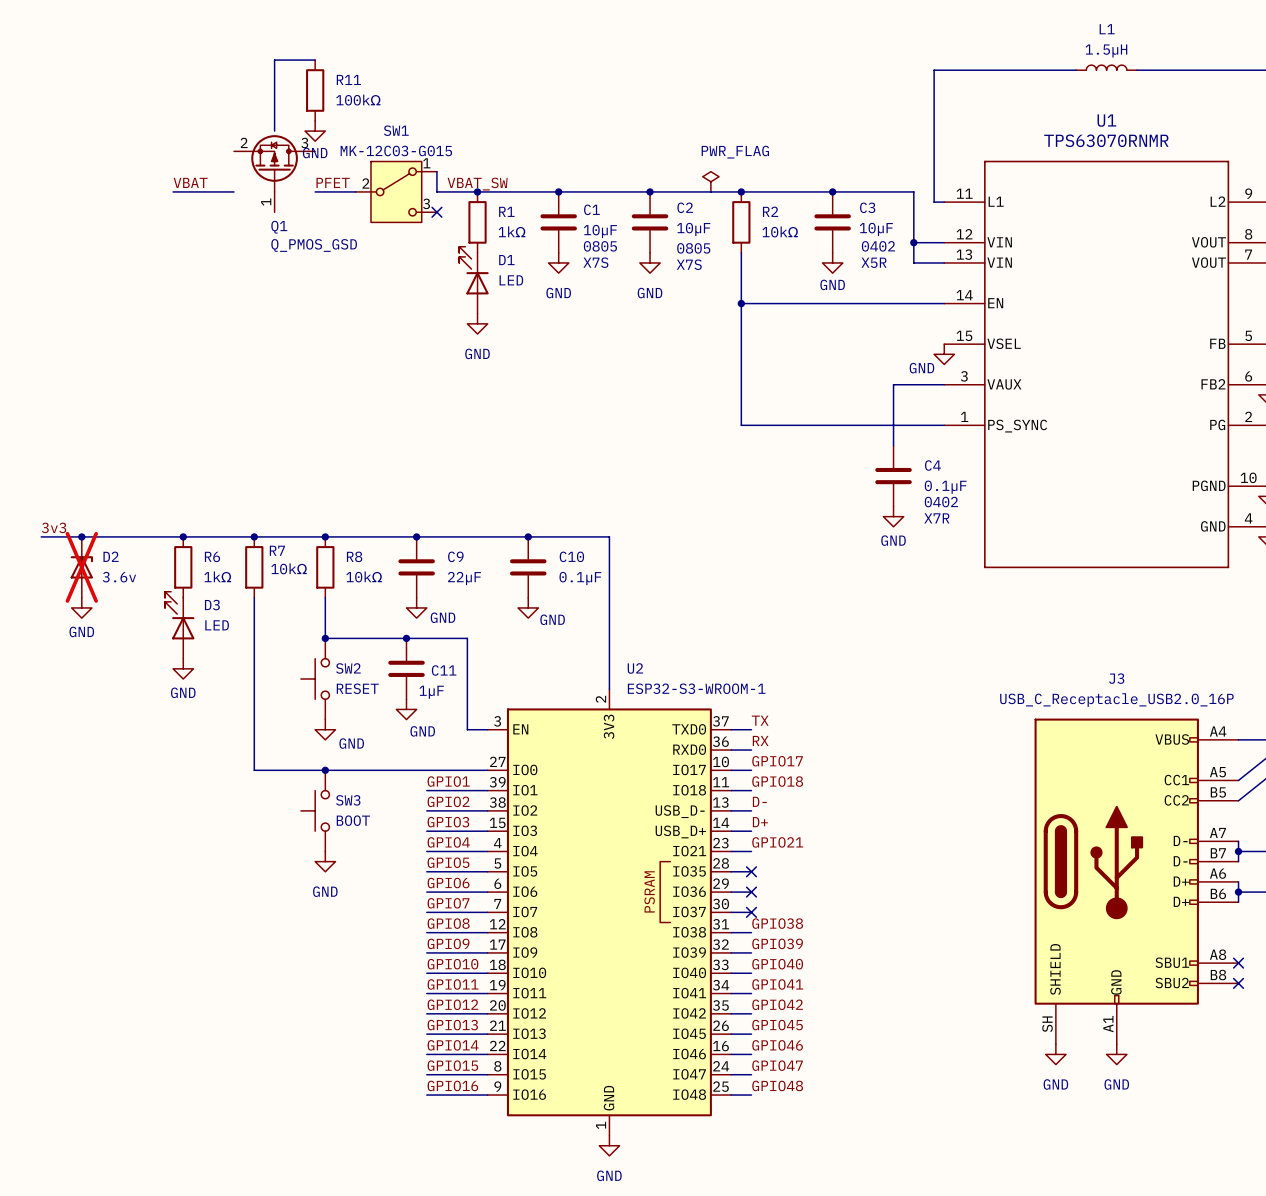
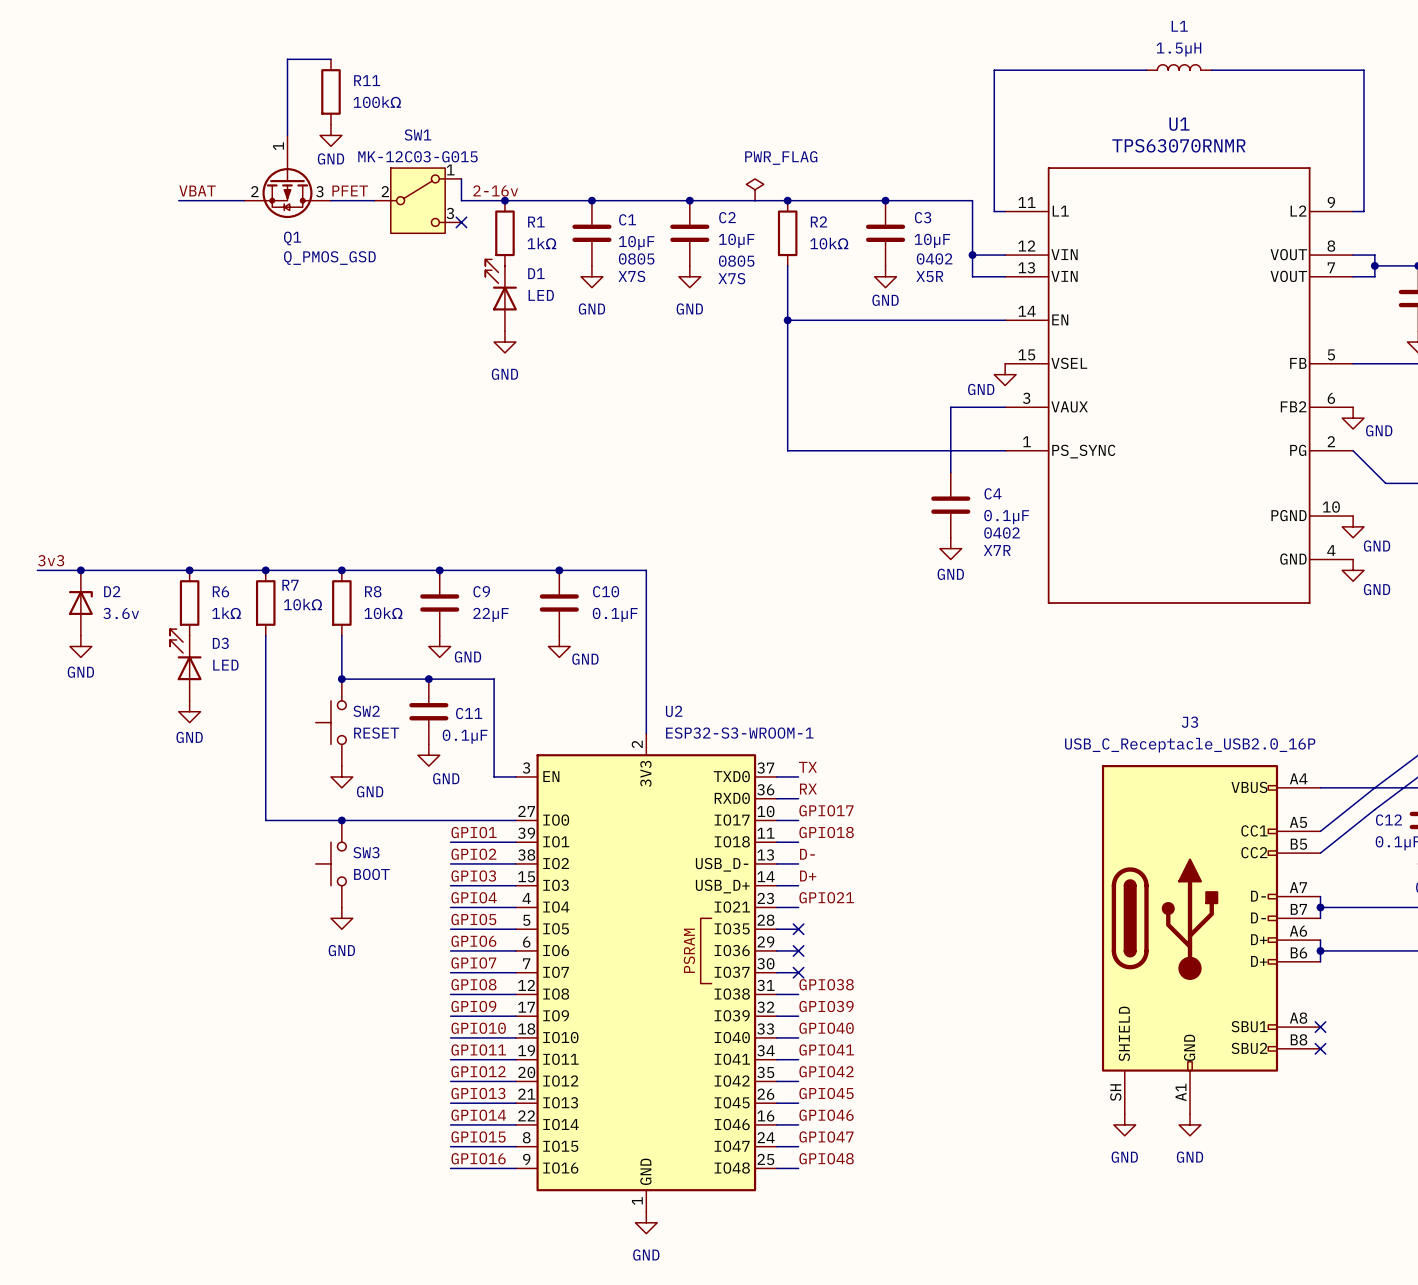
Q1 flip: as is (274, 163) -> up-down (287, 187)
label: VBAT_SW (477, 184) -> 2-16v (495, 190)
D2 do-not-place cross: (81, 567) -> none
C11 value: 1µF (431, 692) -> 0.1µF (465, 736)

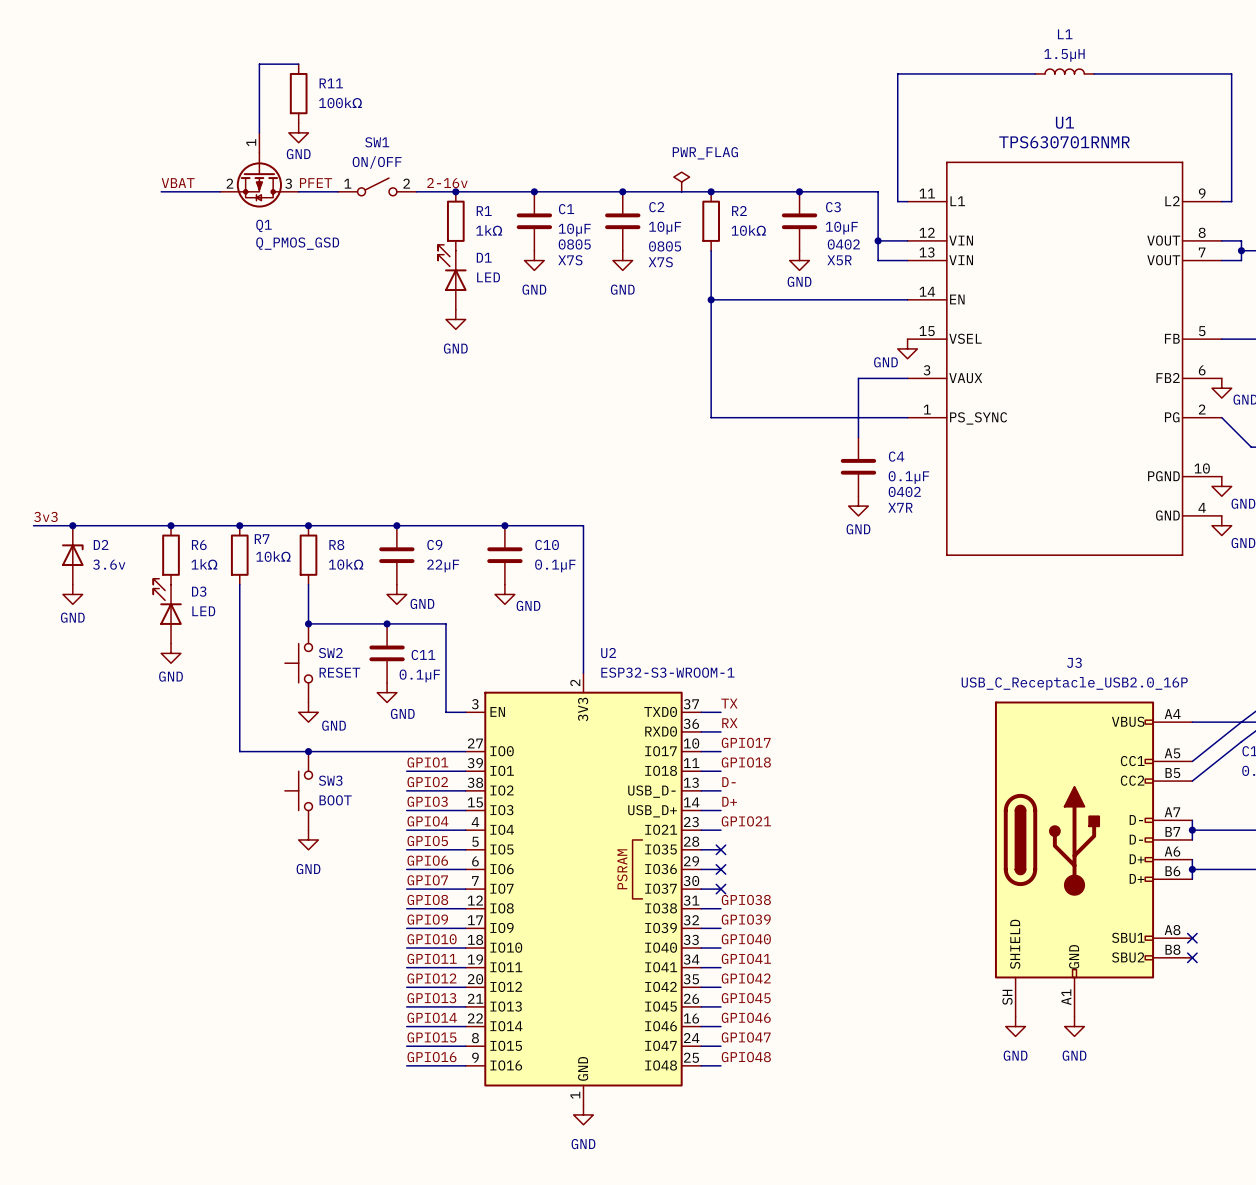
U1 value: TPS63070RNMR (1178, 145) -> TPS630701RNMR (1064, 142)
SW1 value: MK-12C03-G015 (417, 156) -> ON/OFF (377, 162)
SW1 symbol: [374, 168, 462, 234] -> [337, 178, 417, 196]
wire: (461, 178) (461, 200) -> none
no-connect mark: (461, 222) -> none

